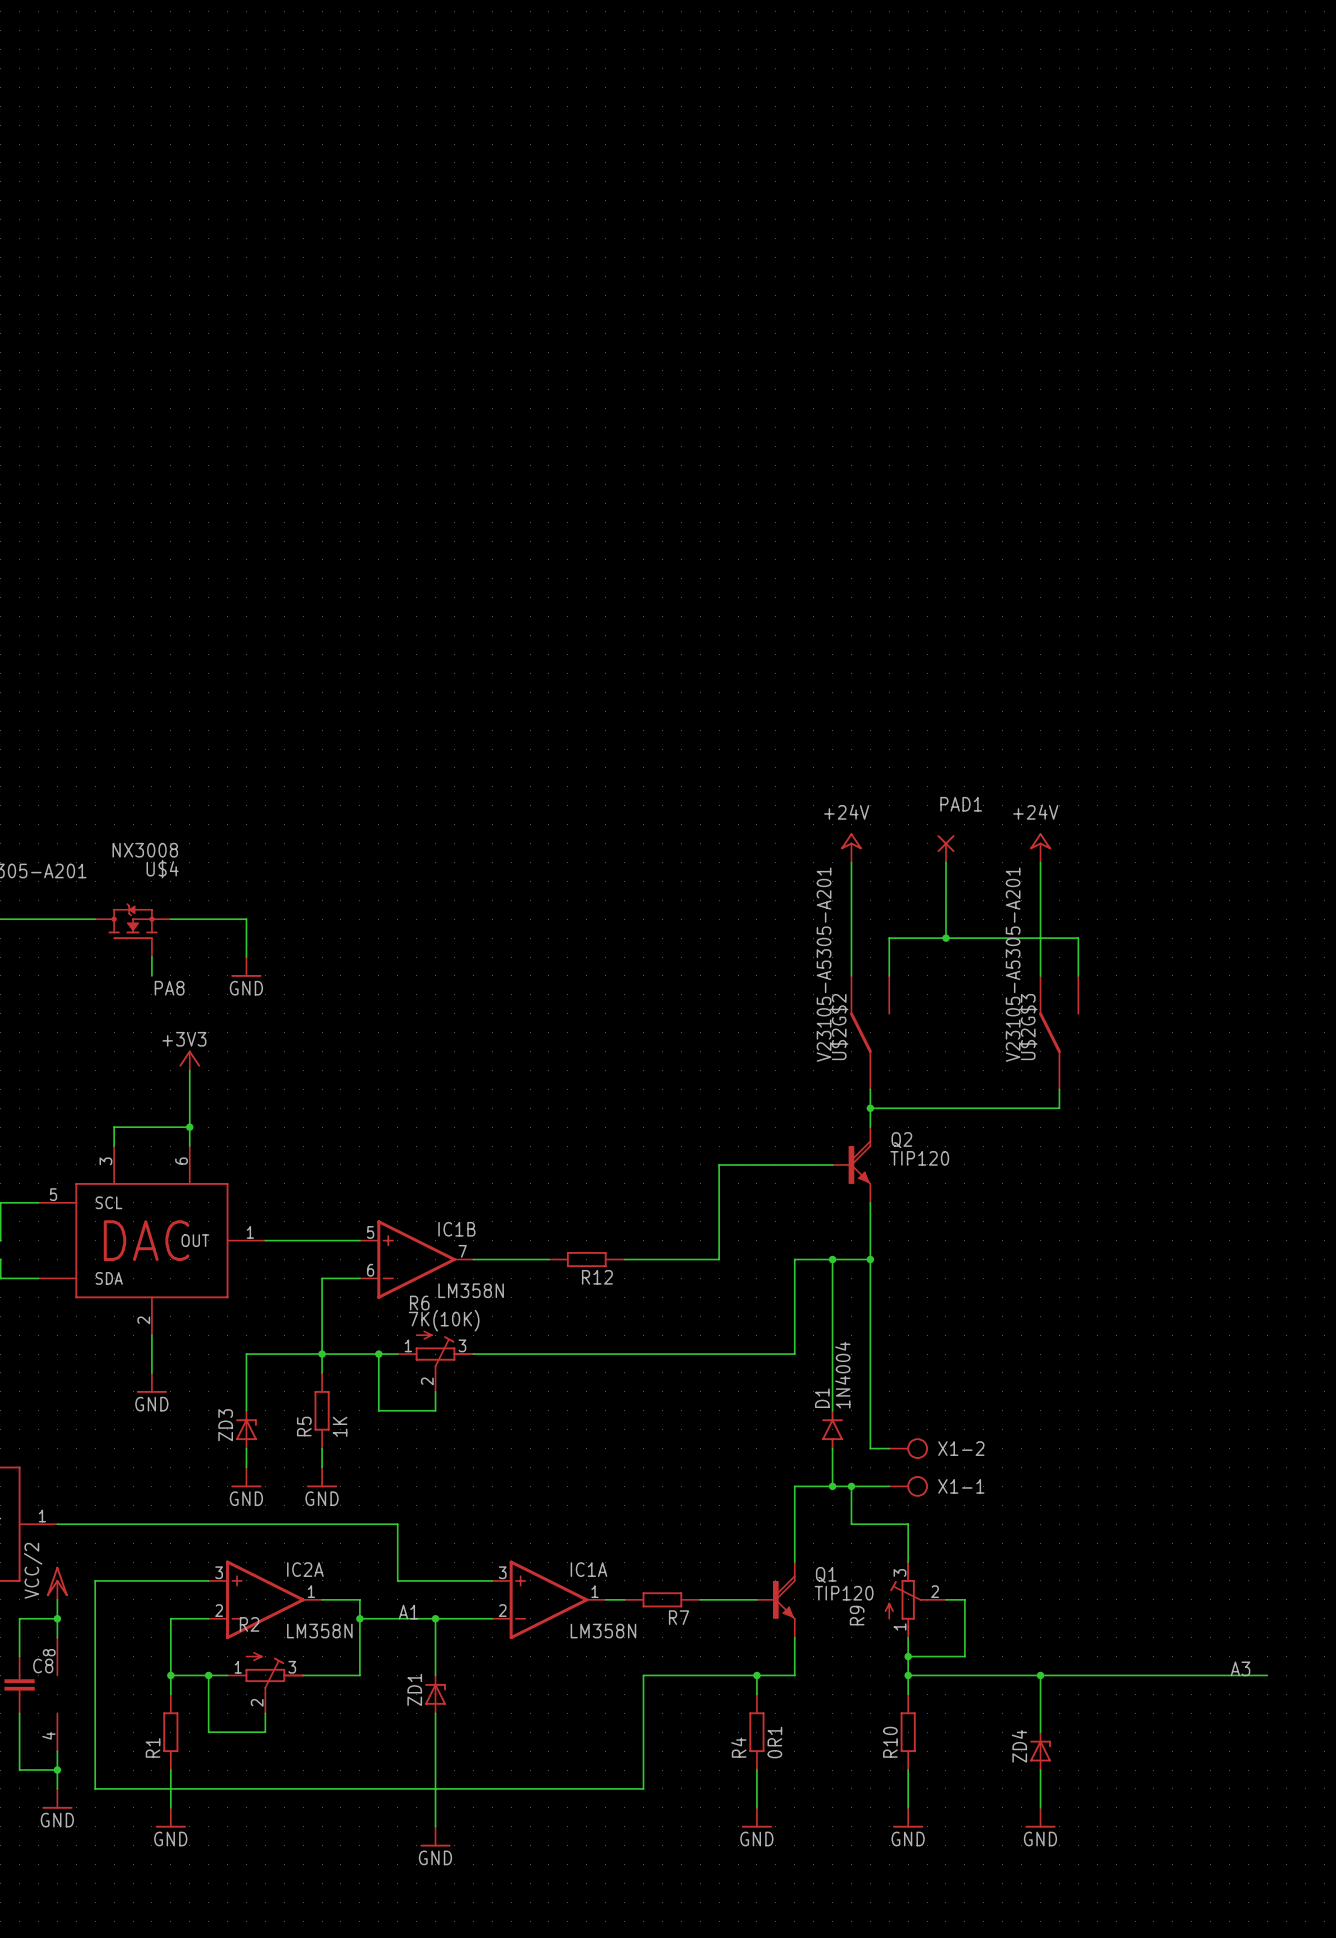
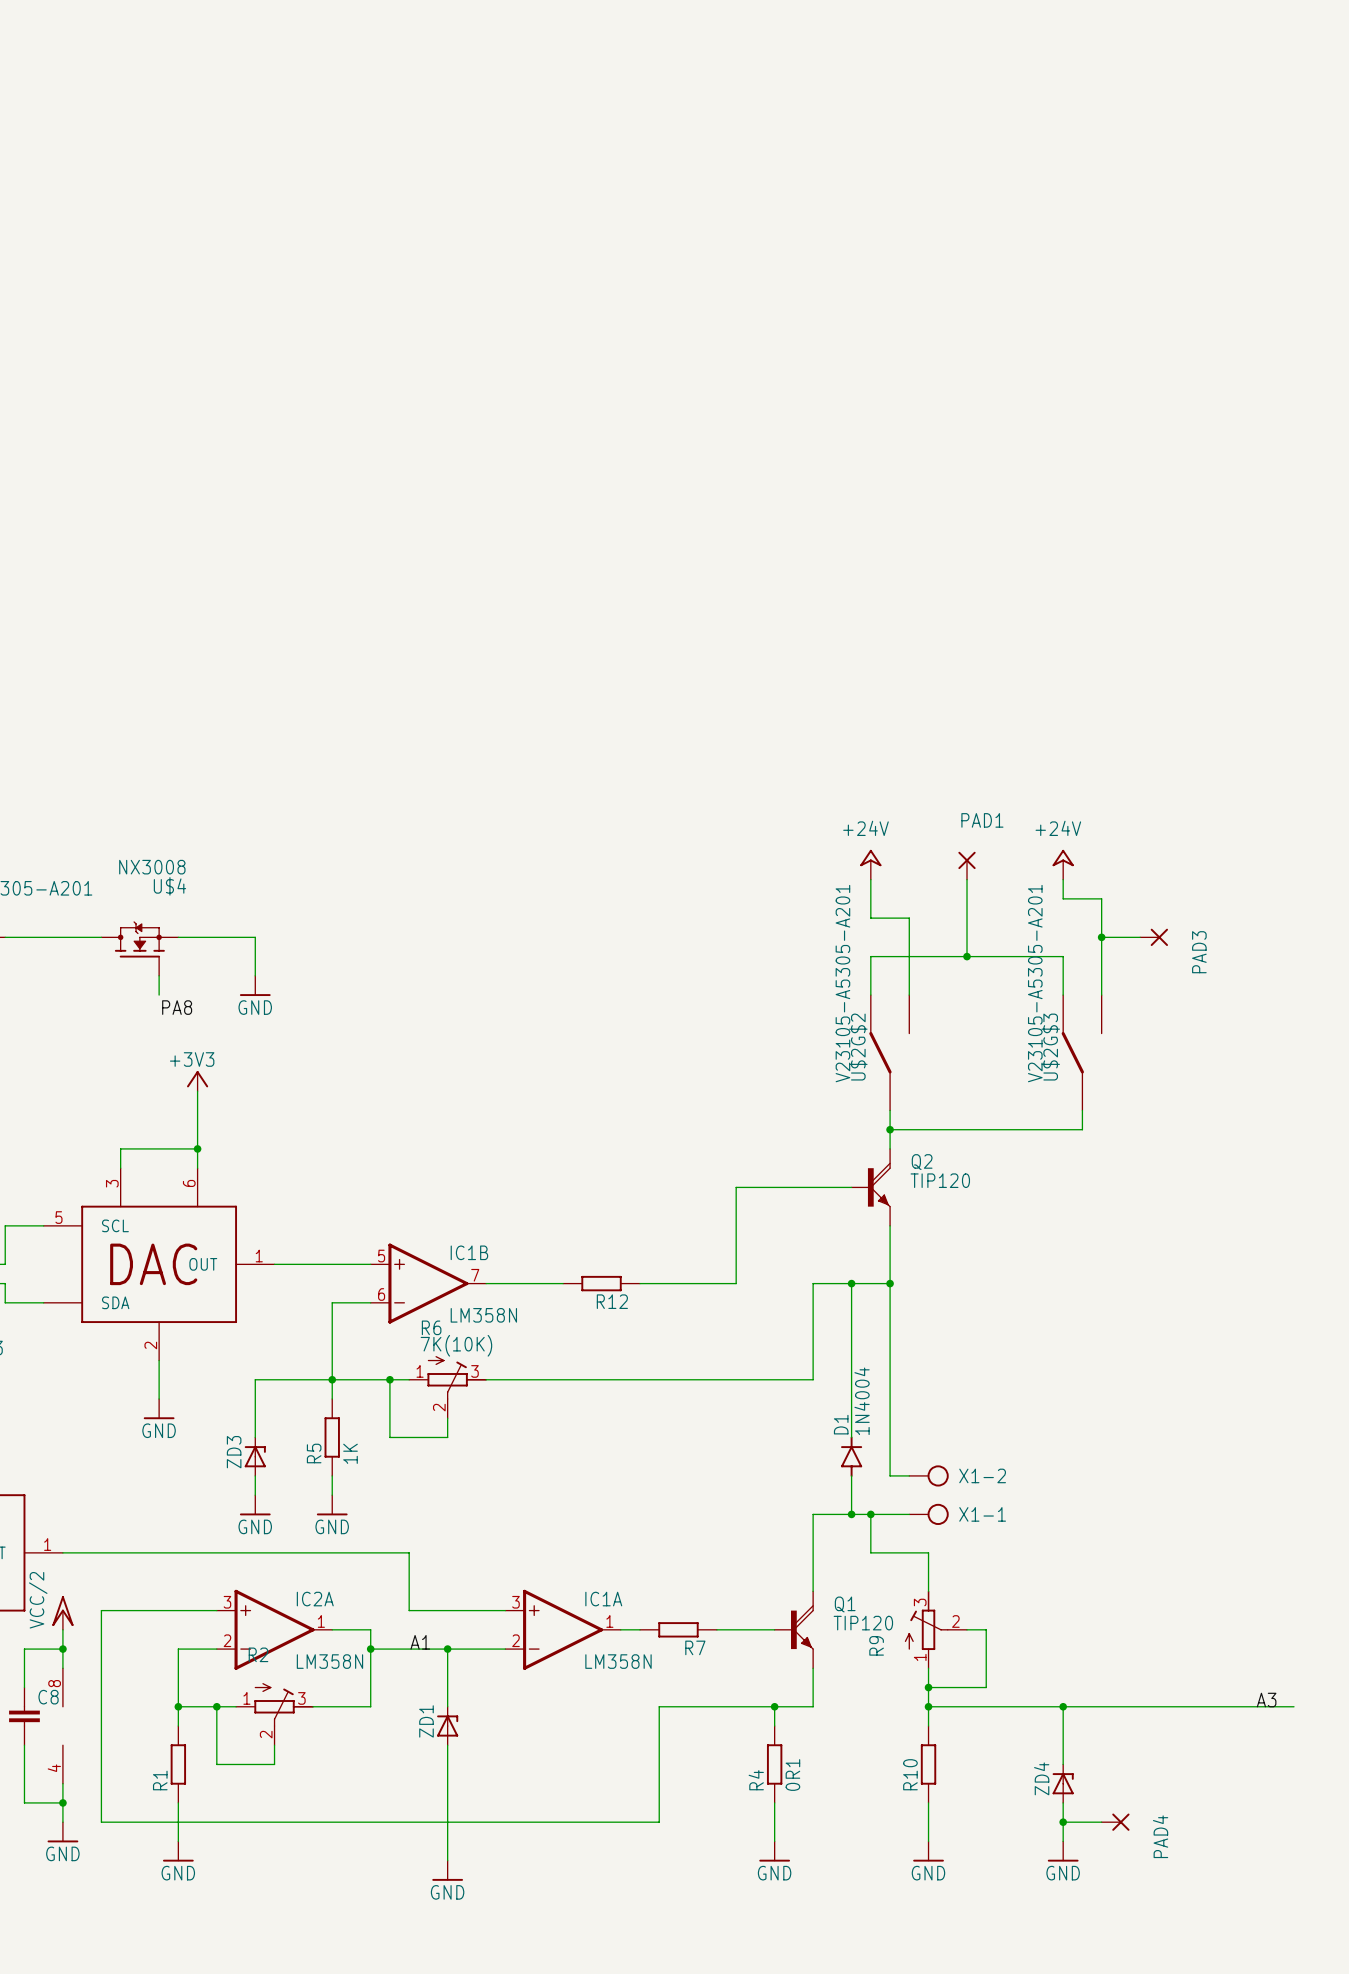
wire: (1040, 881) (1040, 938) (1078, 938) -> (1063, 898) (1101, 898) (1101, 956)
wire: (851, 900) (851, 938) -> (870, 918) (909, 918) (909, 956) (870, 956)
wire: none -> (1101, 937) (1140, 937)
junction: none -> (1101, 937)
PAD3: none -> (1154, 937)
wire: none -> (1063, 1822) (1101, 1822)
junction: none -> (1063, 1822)
PAD4: none -> (1115, 1822)

